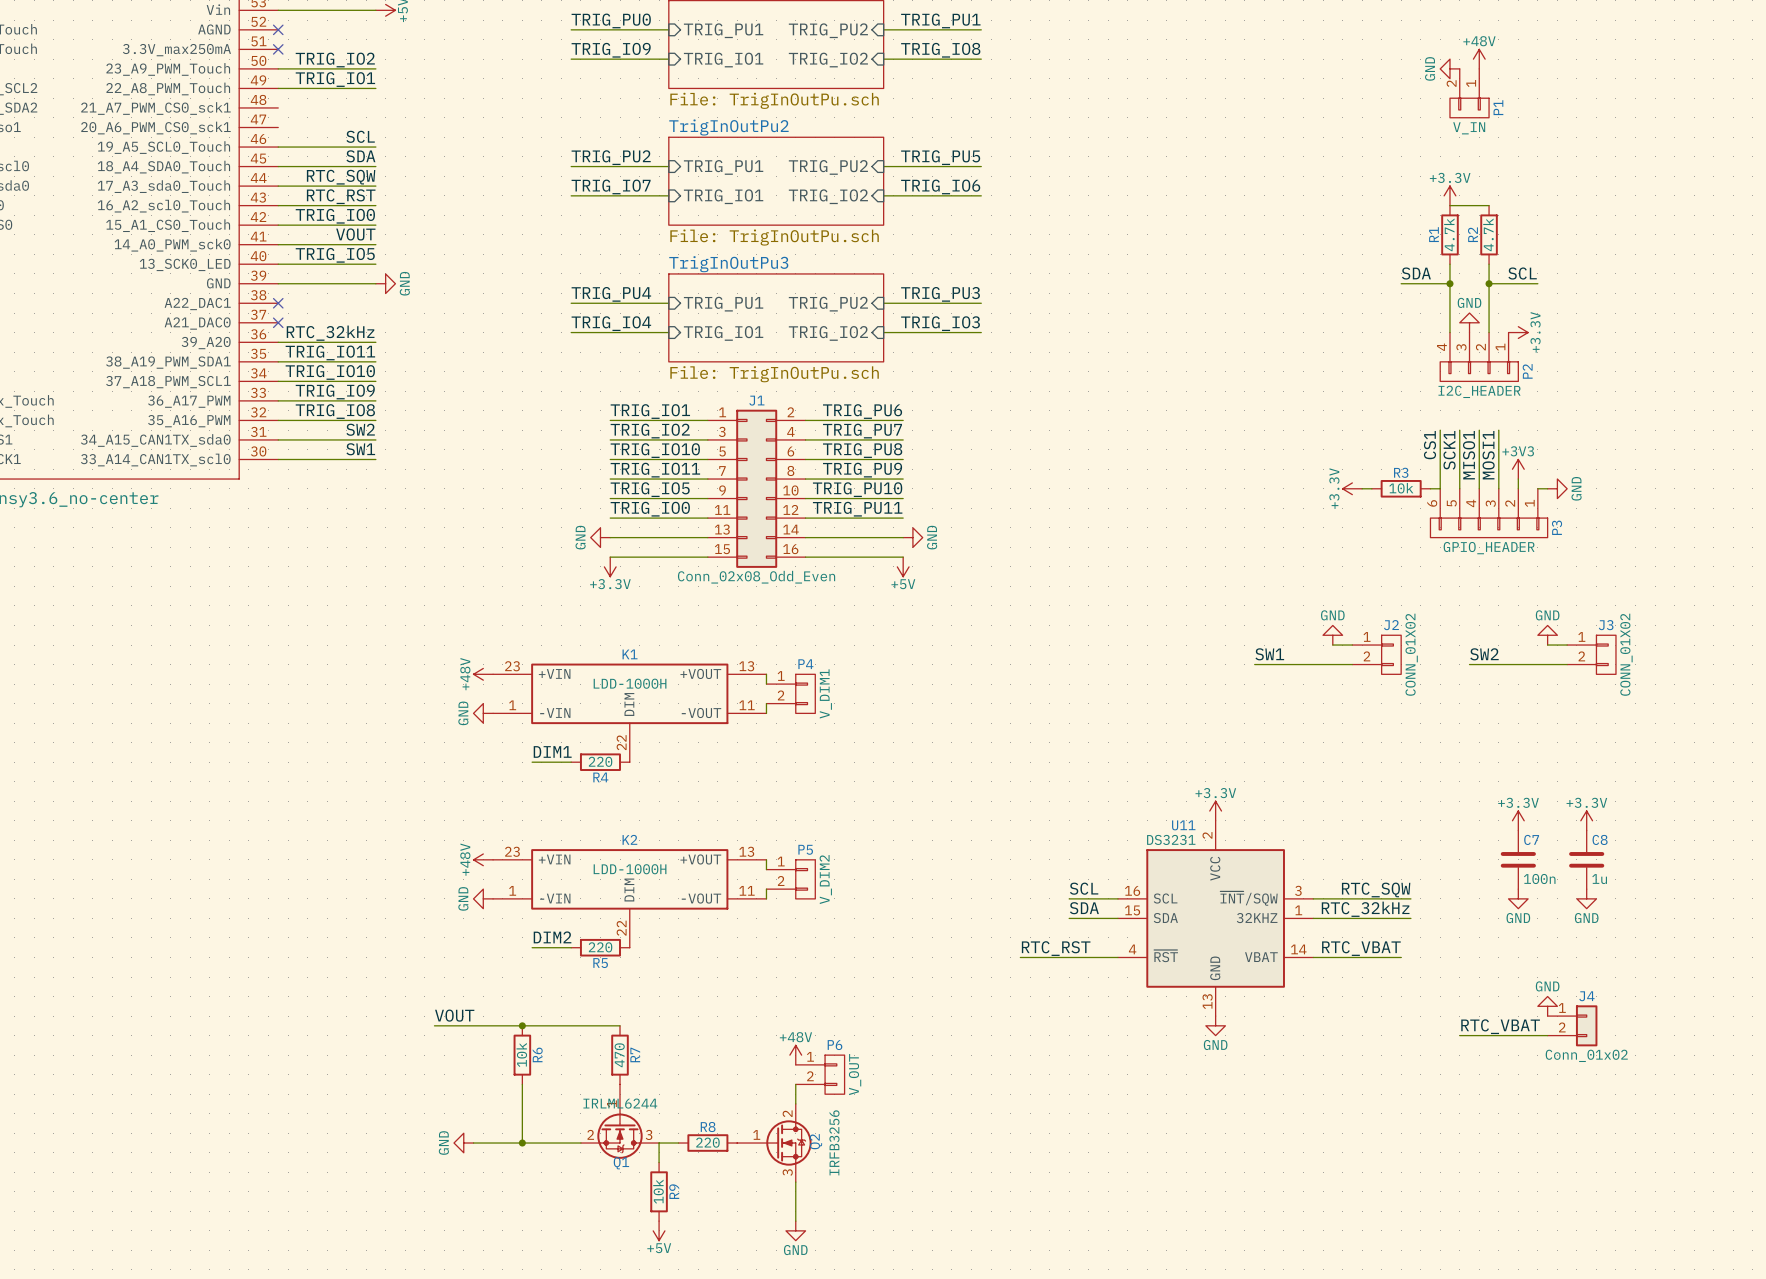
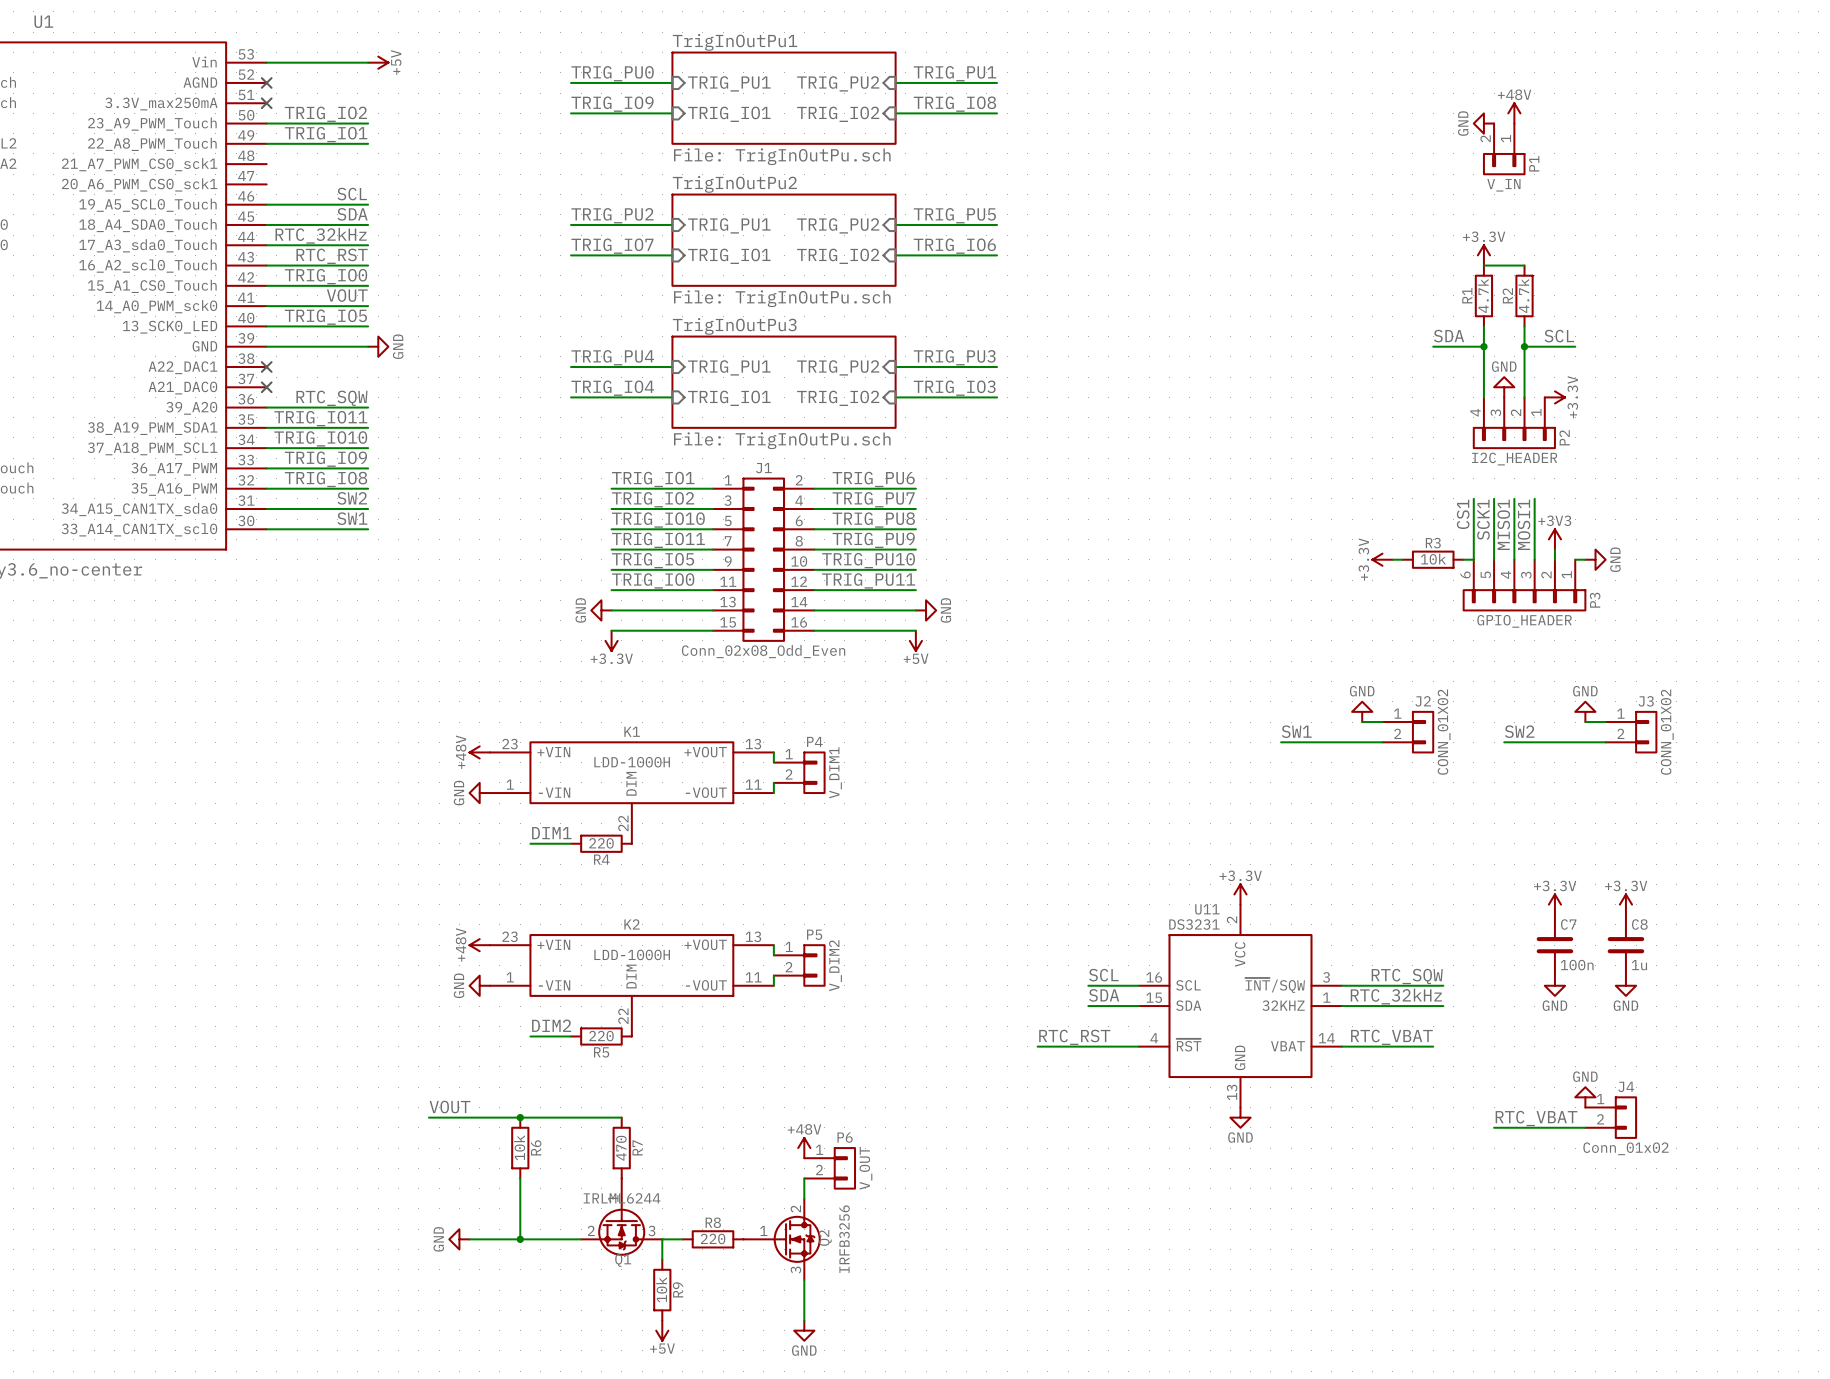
label: RTC_SQW (341, 177) -> RTC_32kHz (321, 235)
label: RTC_32kHz (330, 333) -> RTC_SQW (331, 398)

